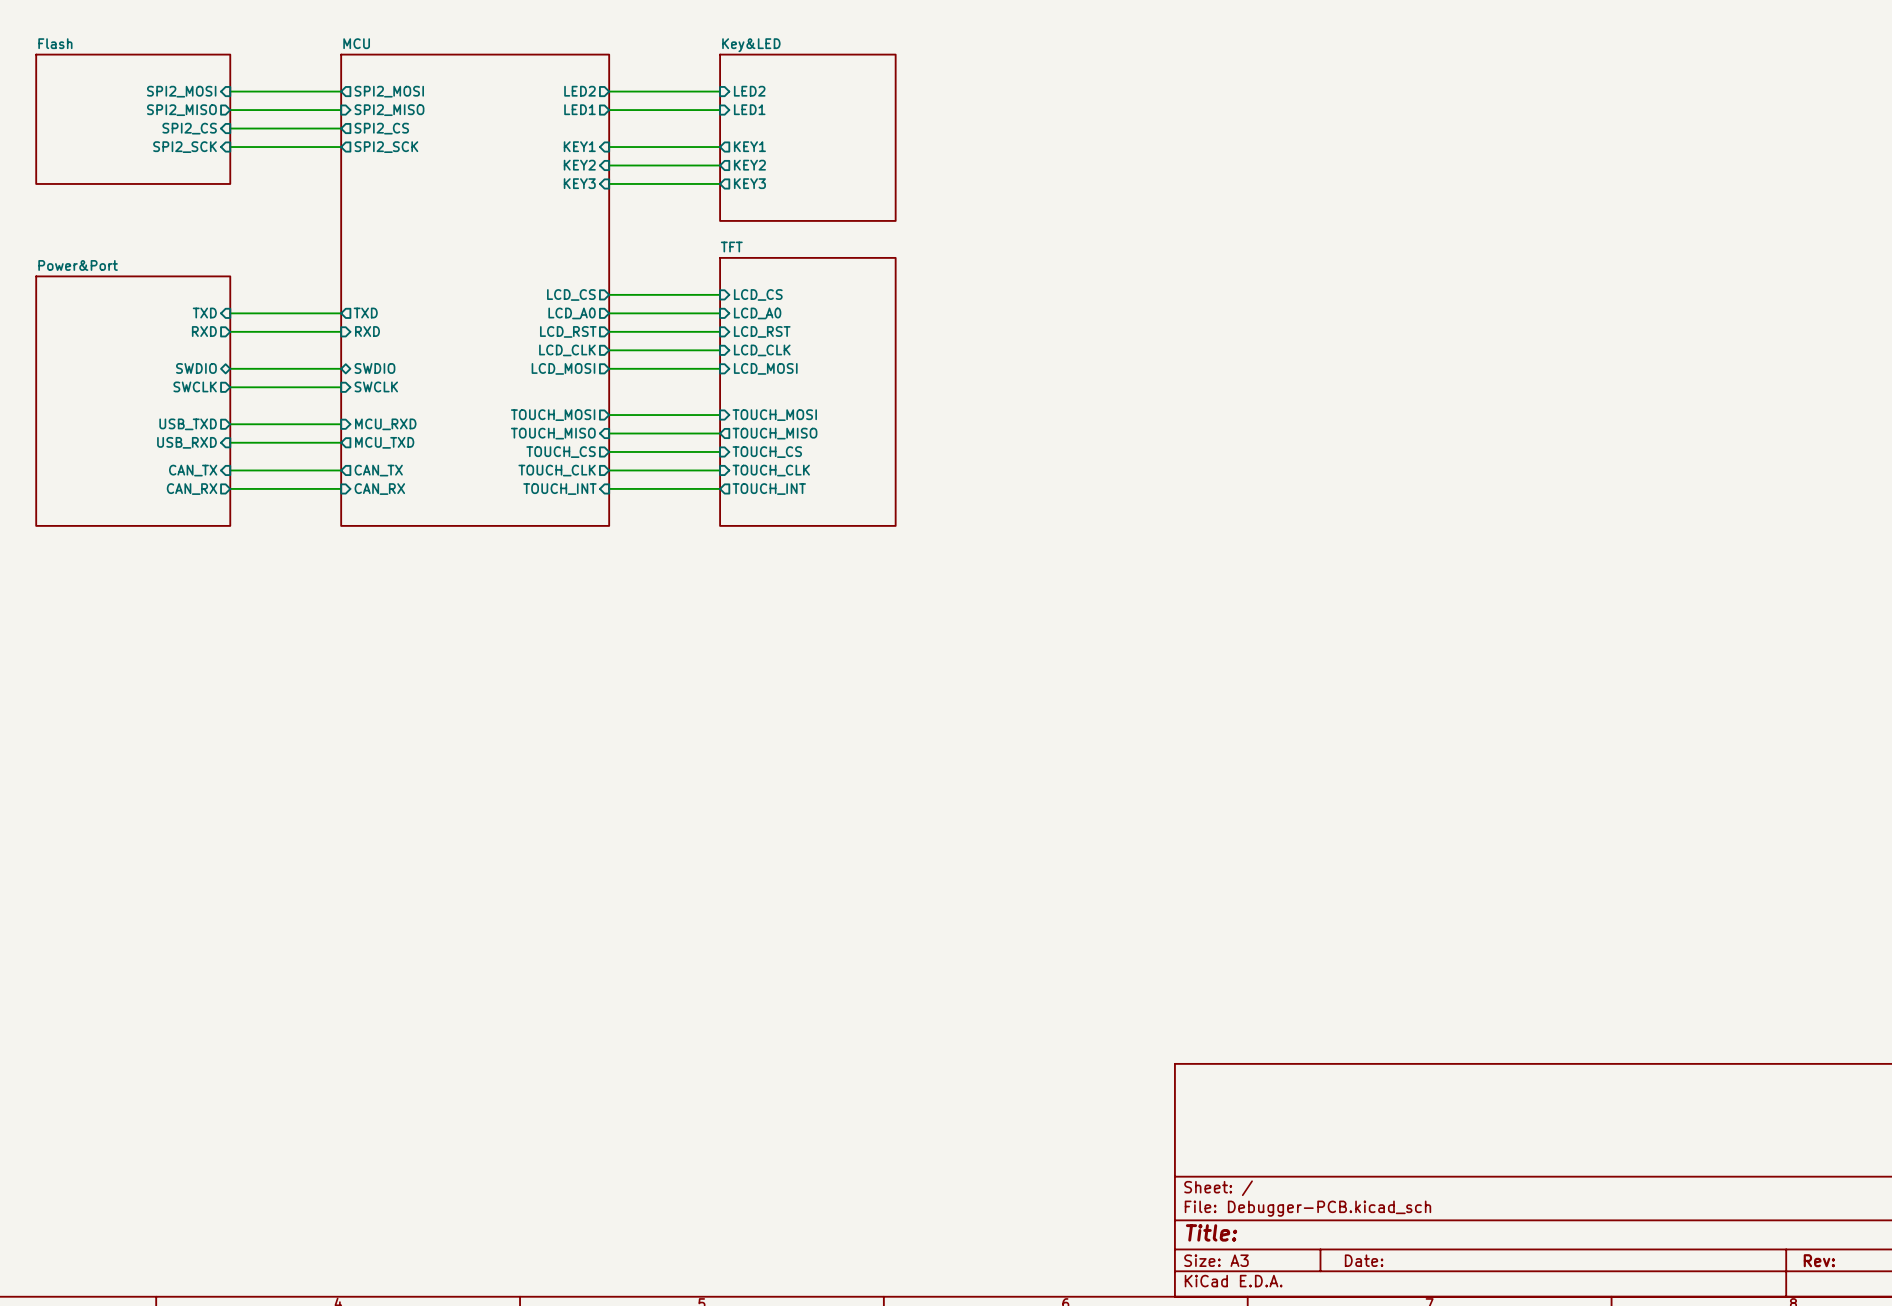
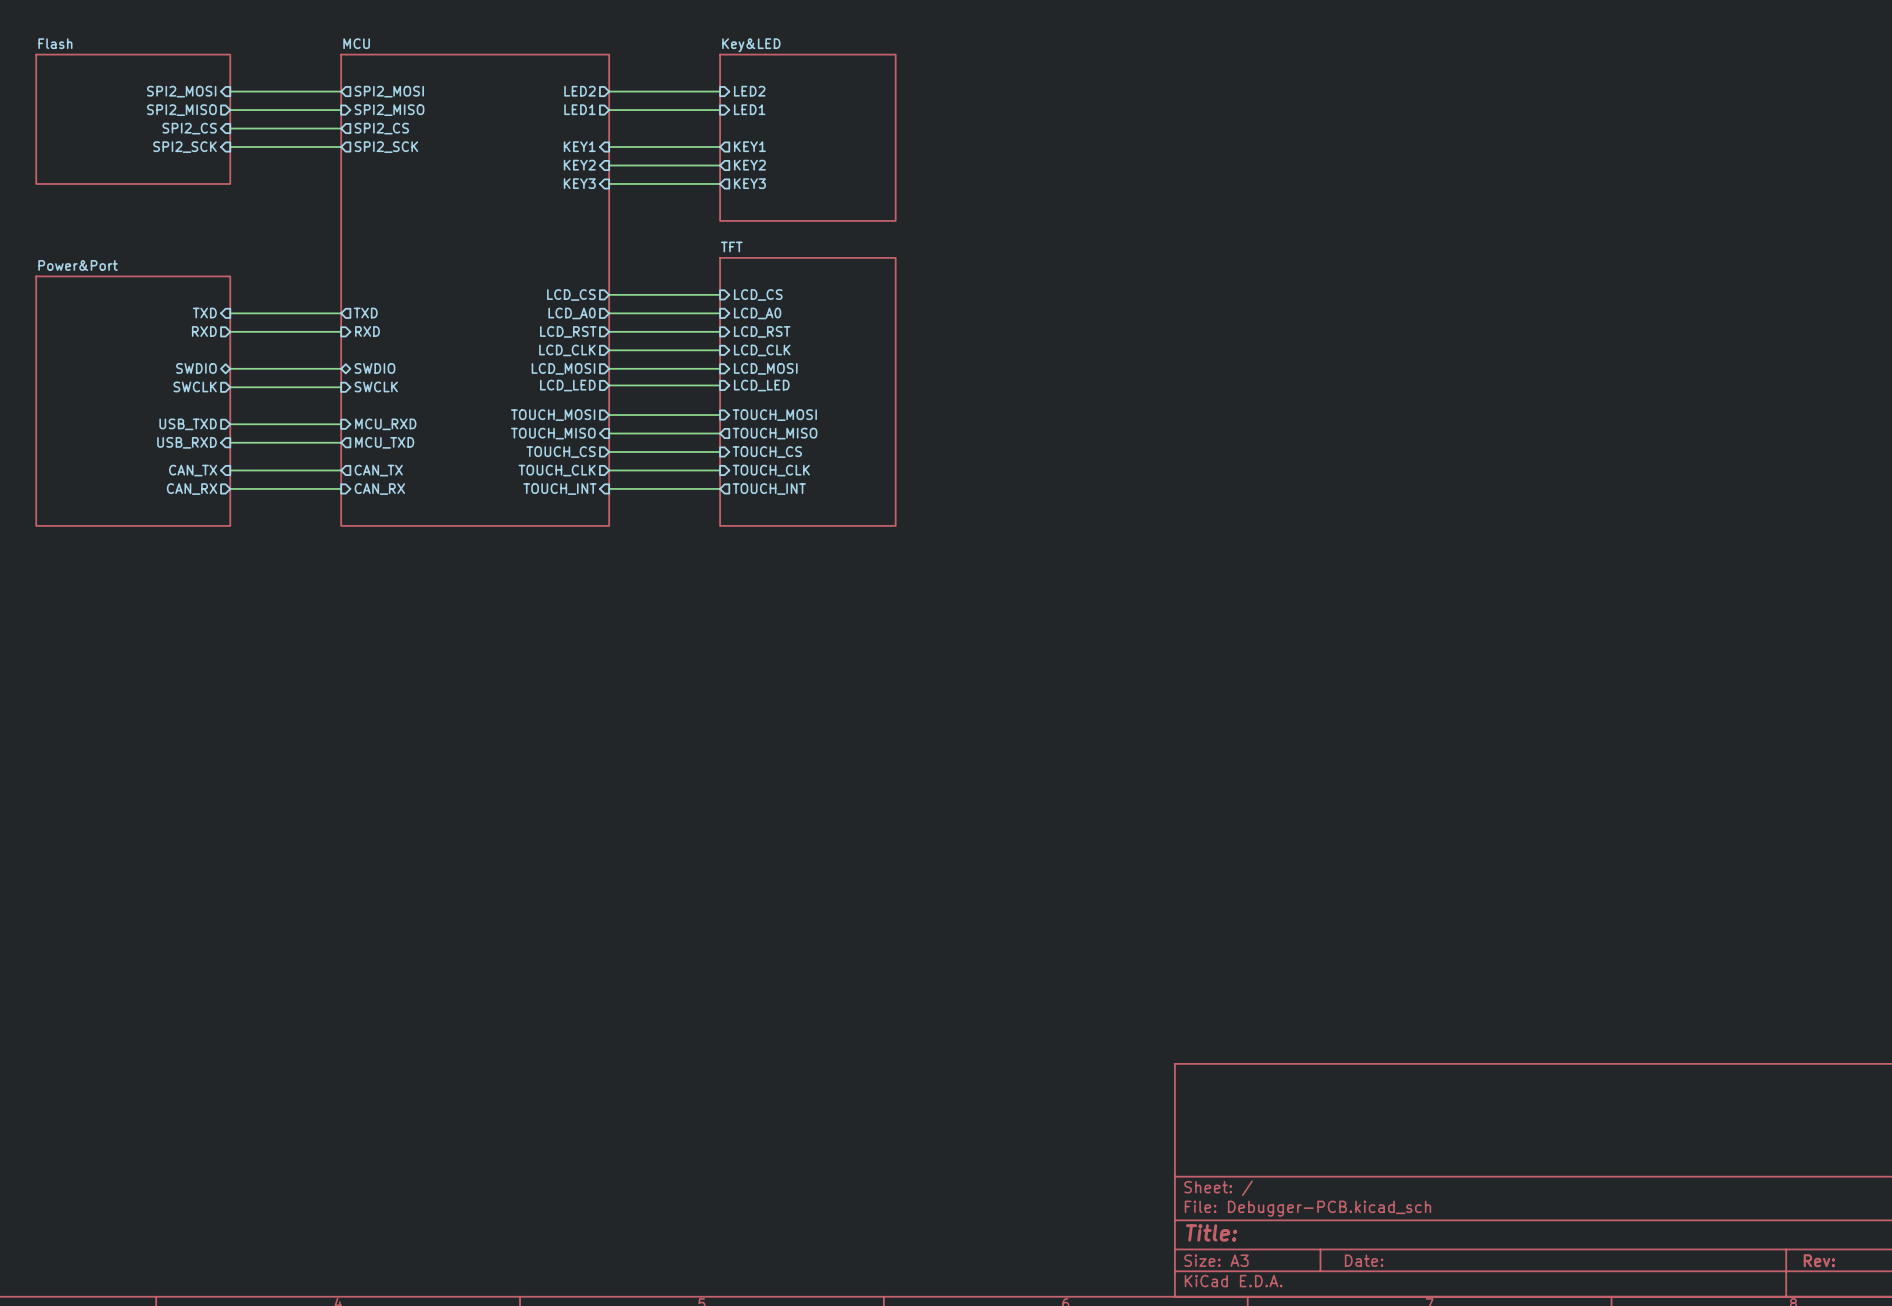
sheet pin: none -> LCD_LED (567, 385)
wire: none -> (609, 385) (720, 385)
sheet pin: none -> LCD_LED (761, 385)

